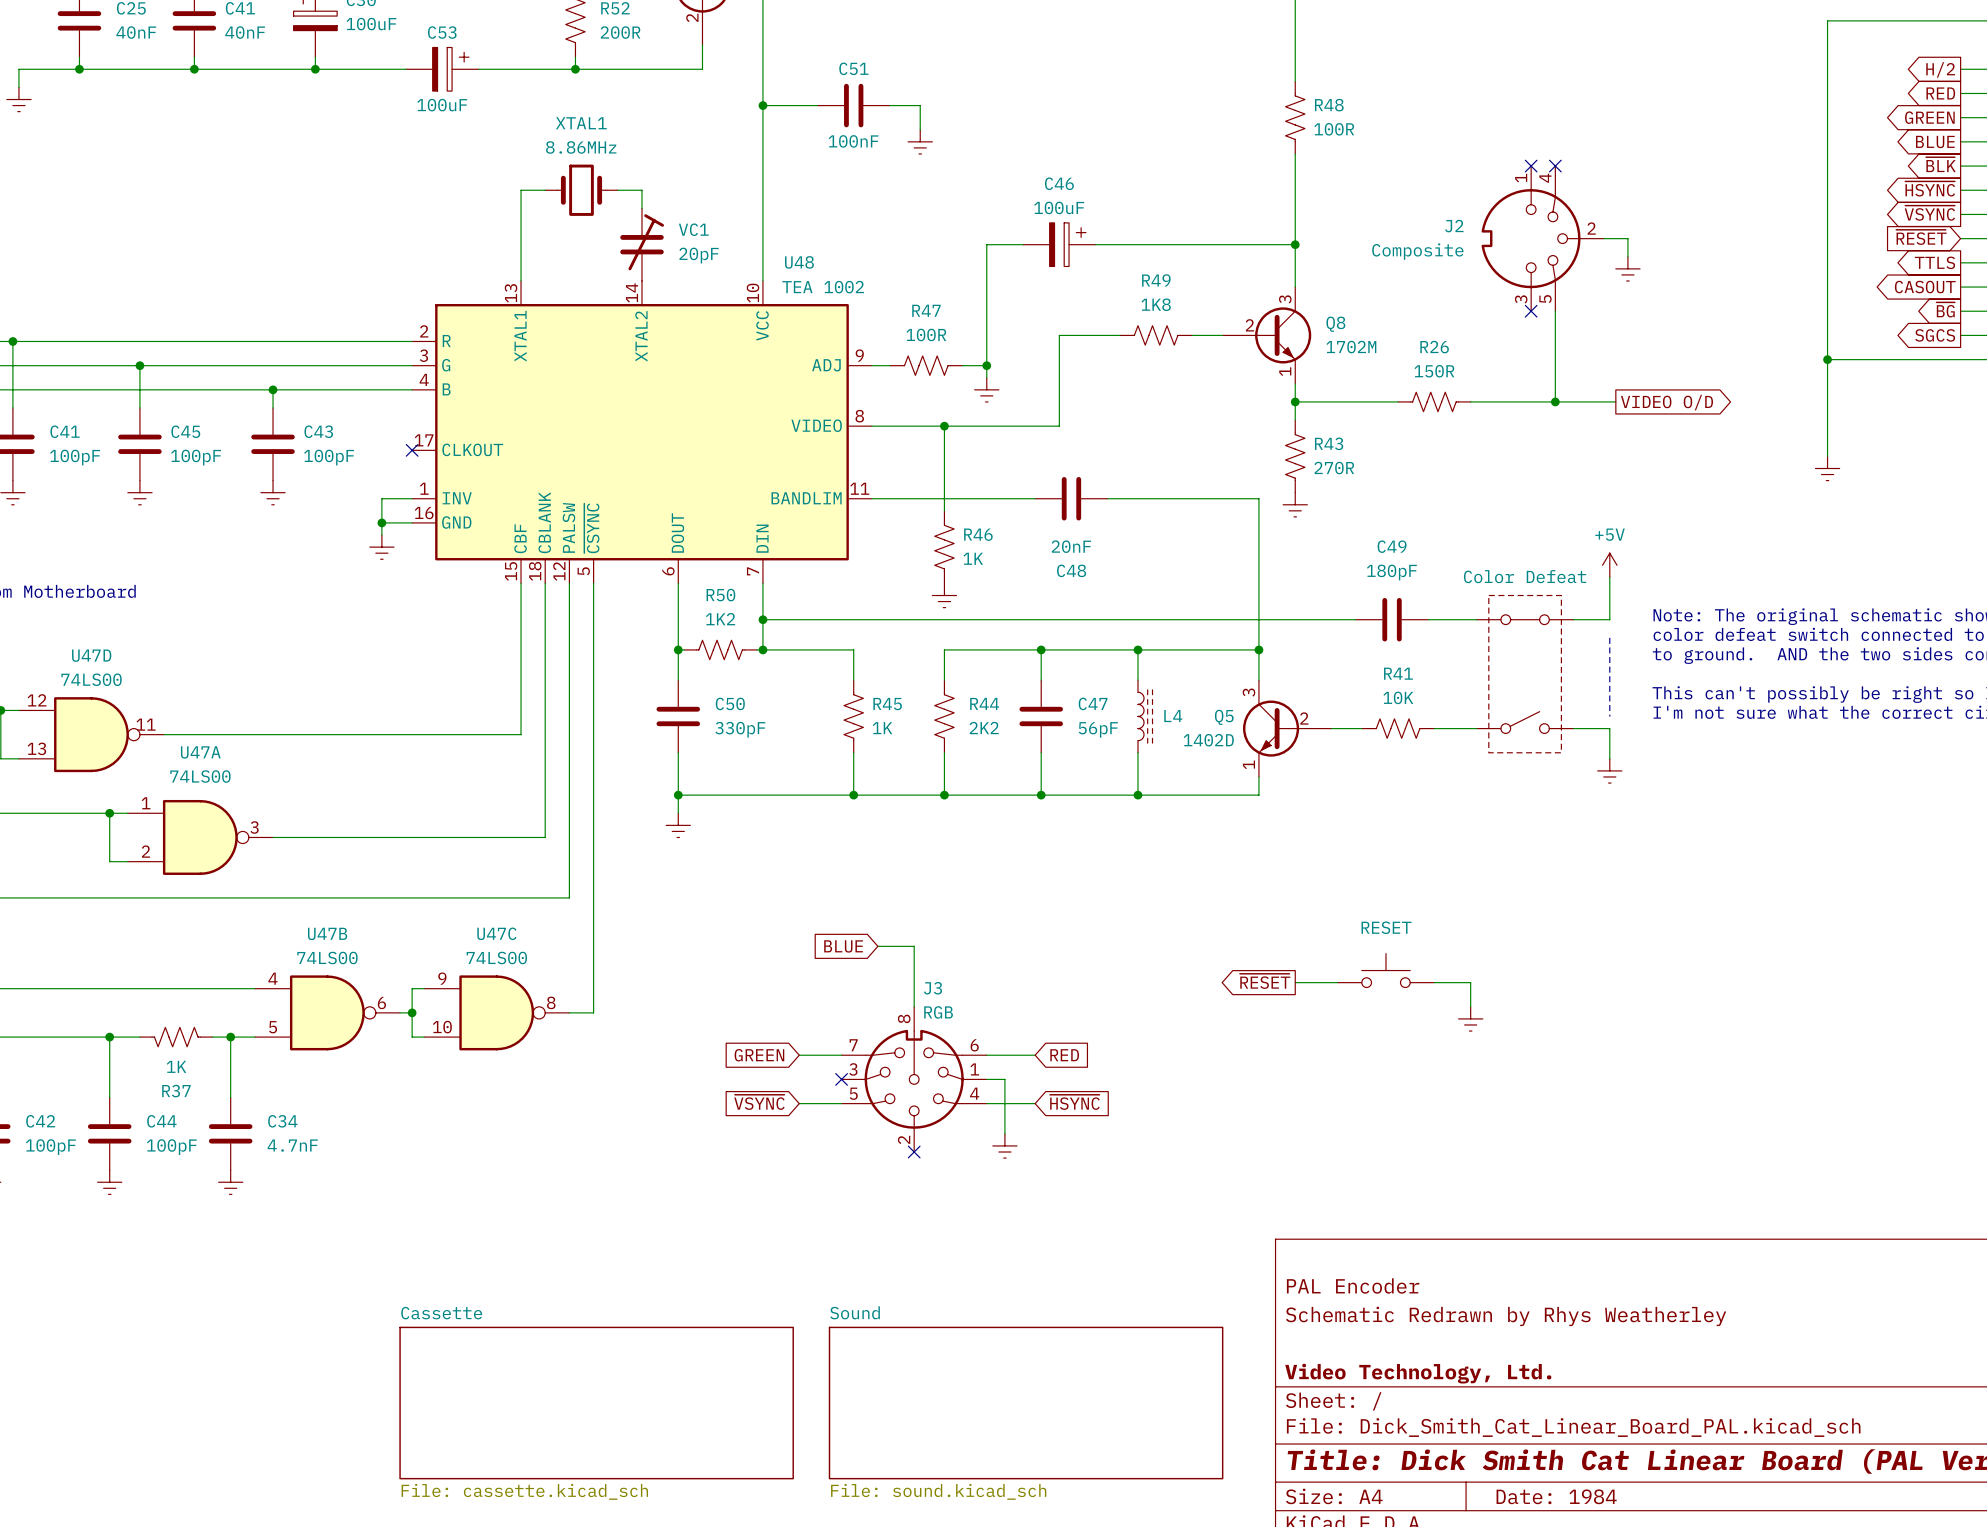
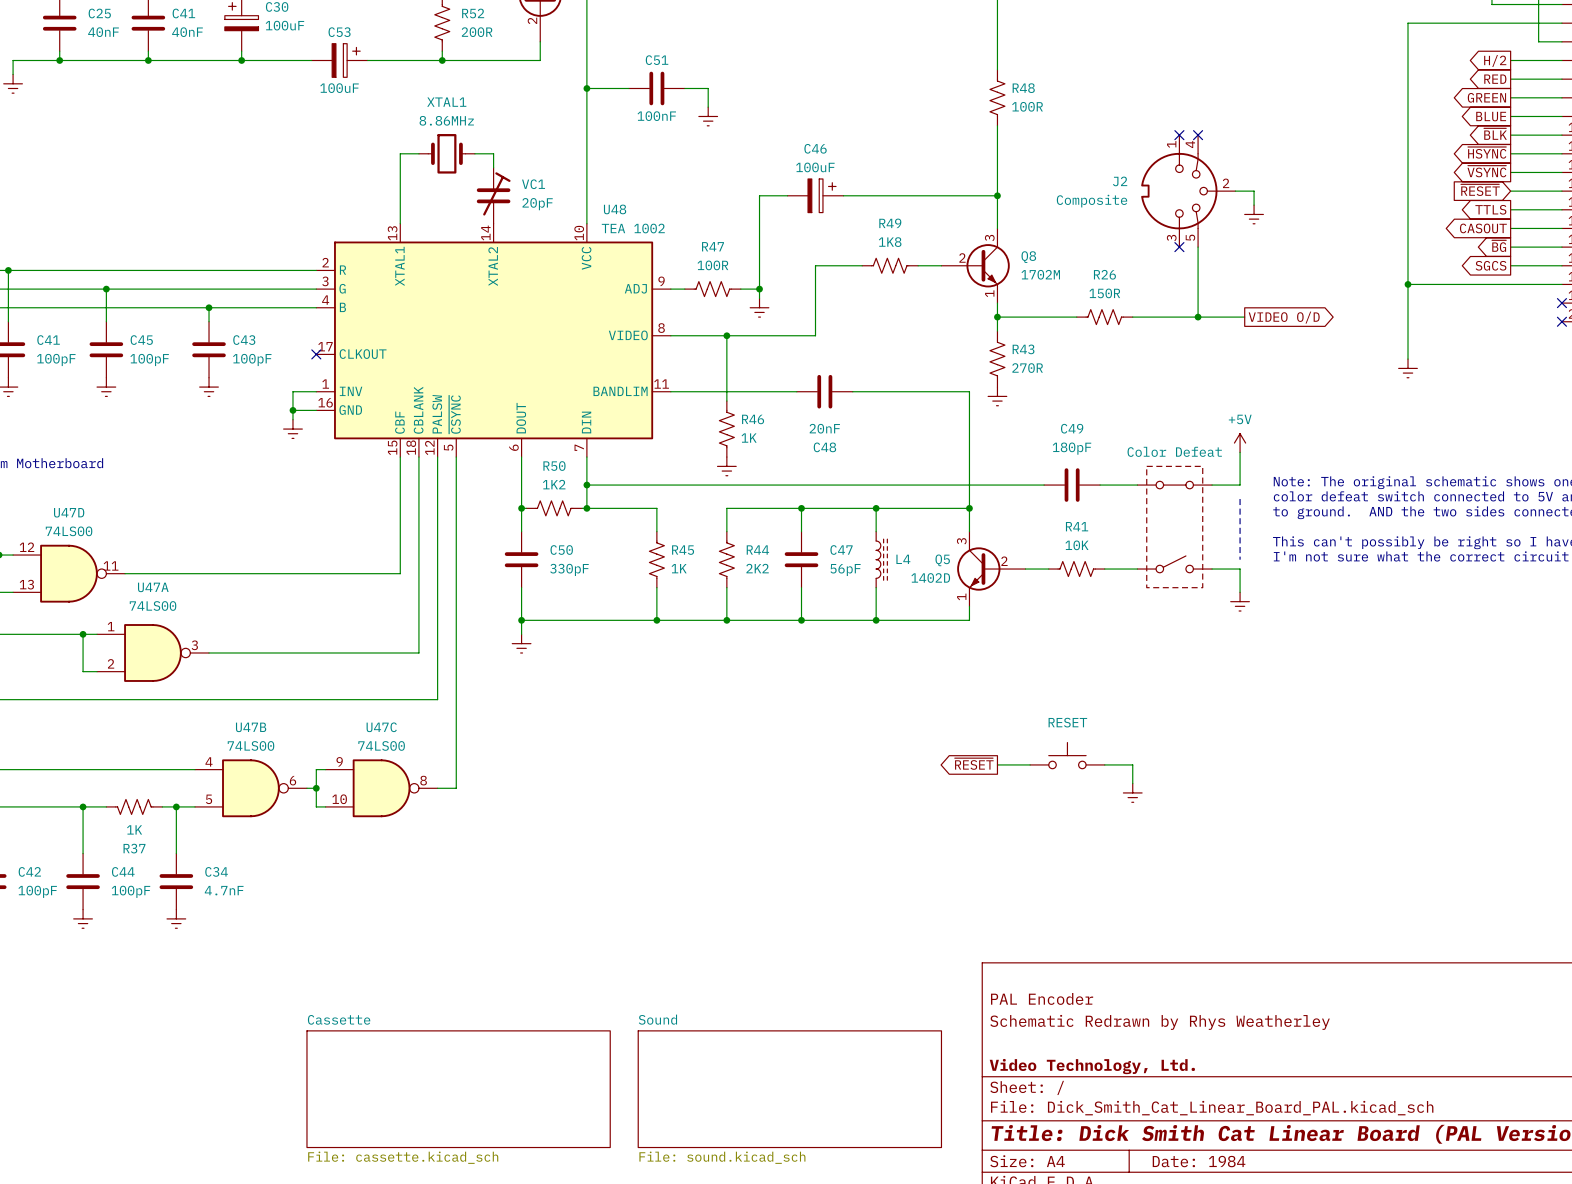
global label: BLUE (843, 946) -> none
wire: (877, 946) (914, 946) (914, 1006) -> none
global label: GREEN (759, 1055) -> none
wire: (799, 1055) (841, 1055) -> none
wire: (986, 1055) (1035, 1055) -> none
global label: RED (1064, 1055) -> none
no-connect mark: (841, 1079) -> none
J3: RGB (914, 1079) -> none
wire: (986, 1079) (1004, 1079) (1004, 1133) -> none
global label: ~{VSYNC} (759, 1102) -> none
global label: ~{HSYNC} (1074, 1102) -> none
wire: (799, 1103) (841, 1103) -> none
wire: (986, 1103) (1035, 1103) -> none
power symbol: (1004, 1145) -> none
no-connect mark: (914, 1152) -> none

